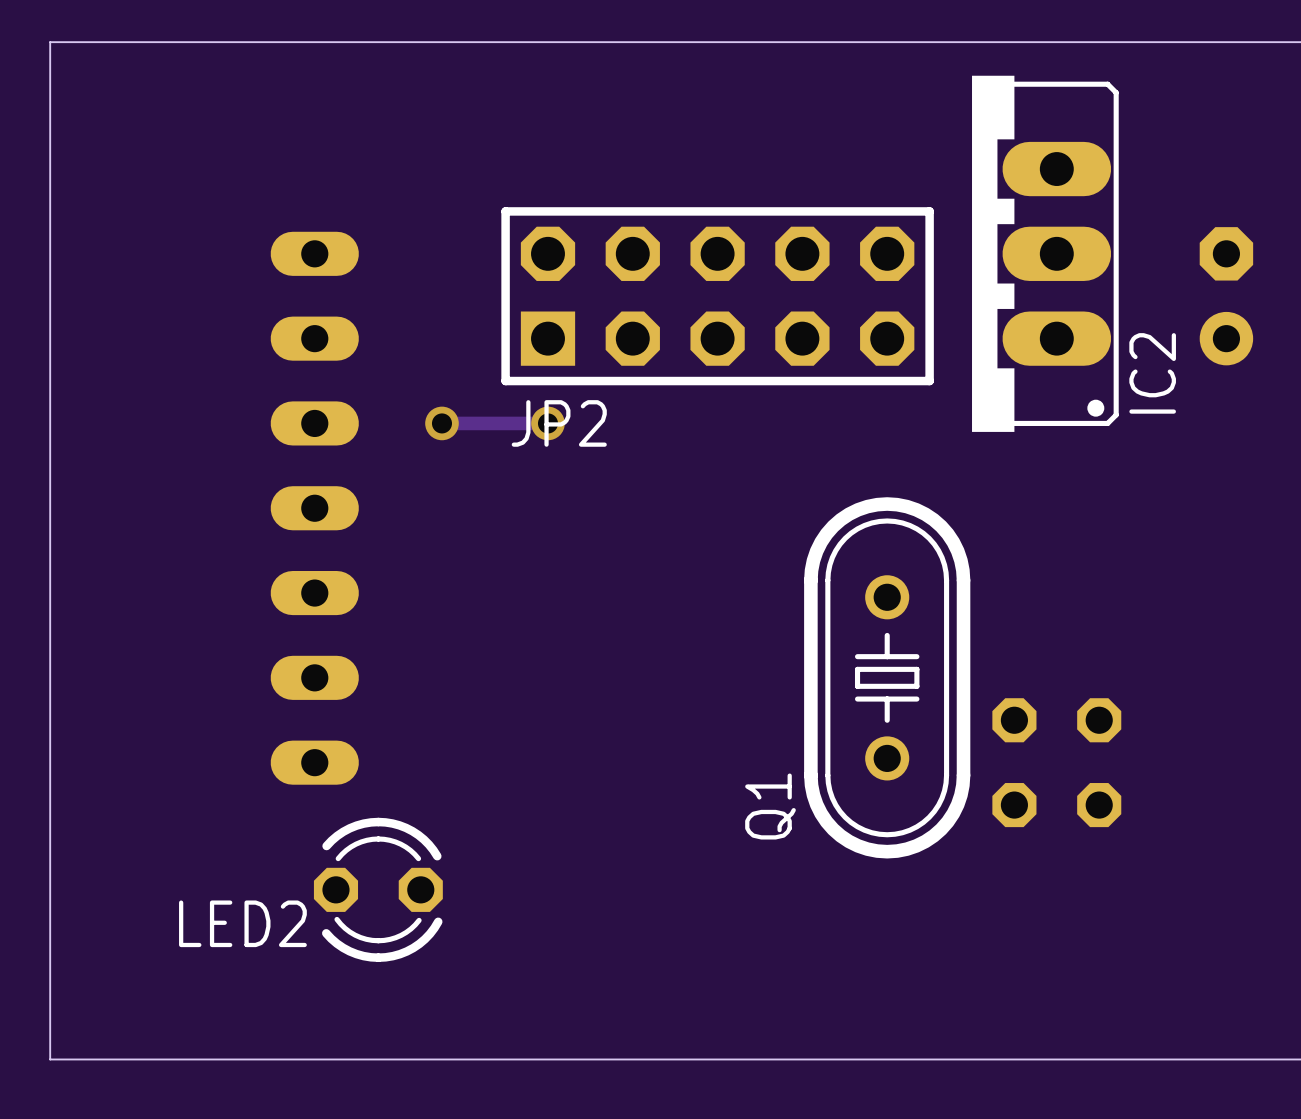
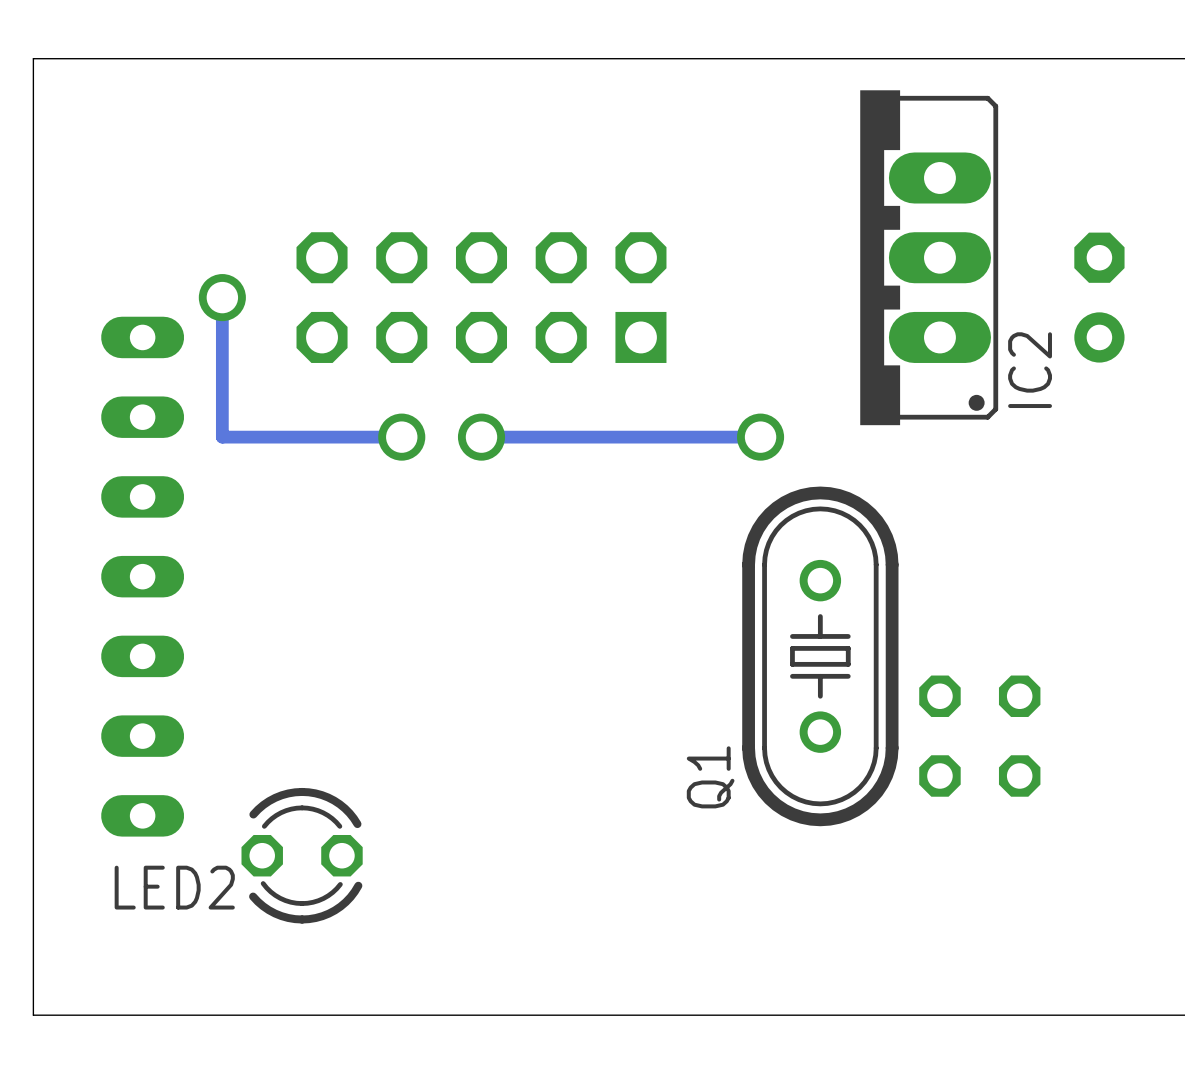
IC2 position: (1045, 253) -> (929, 257)
track: none -> (222, 297) (222, 437) (401, 437)
via: none -> (222, 297)
JP2 side: bottom (717, 296) -> top (481, 297)
part position: (1226, 296) -> (1099, 297)
via size: [425, 406, 459, 441] -> [378, 413, 426, 461]
via size: [531, 406, 565, 441] -> [457, 413, 506, 461]
track: (547, 423) (441, 423) -> none
track: none -> (760, 437) (481, 437)
via: none -> (760, 437)
part position: (314, 508) -> (142, 576)
LED2 position: (378, 889) -> (302, 855)

